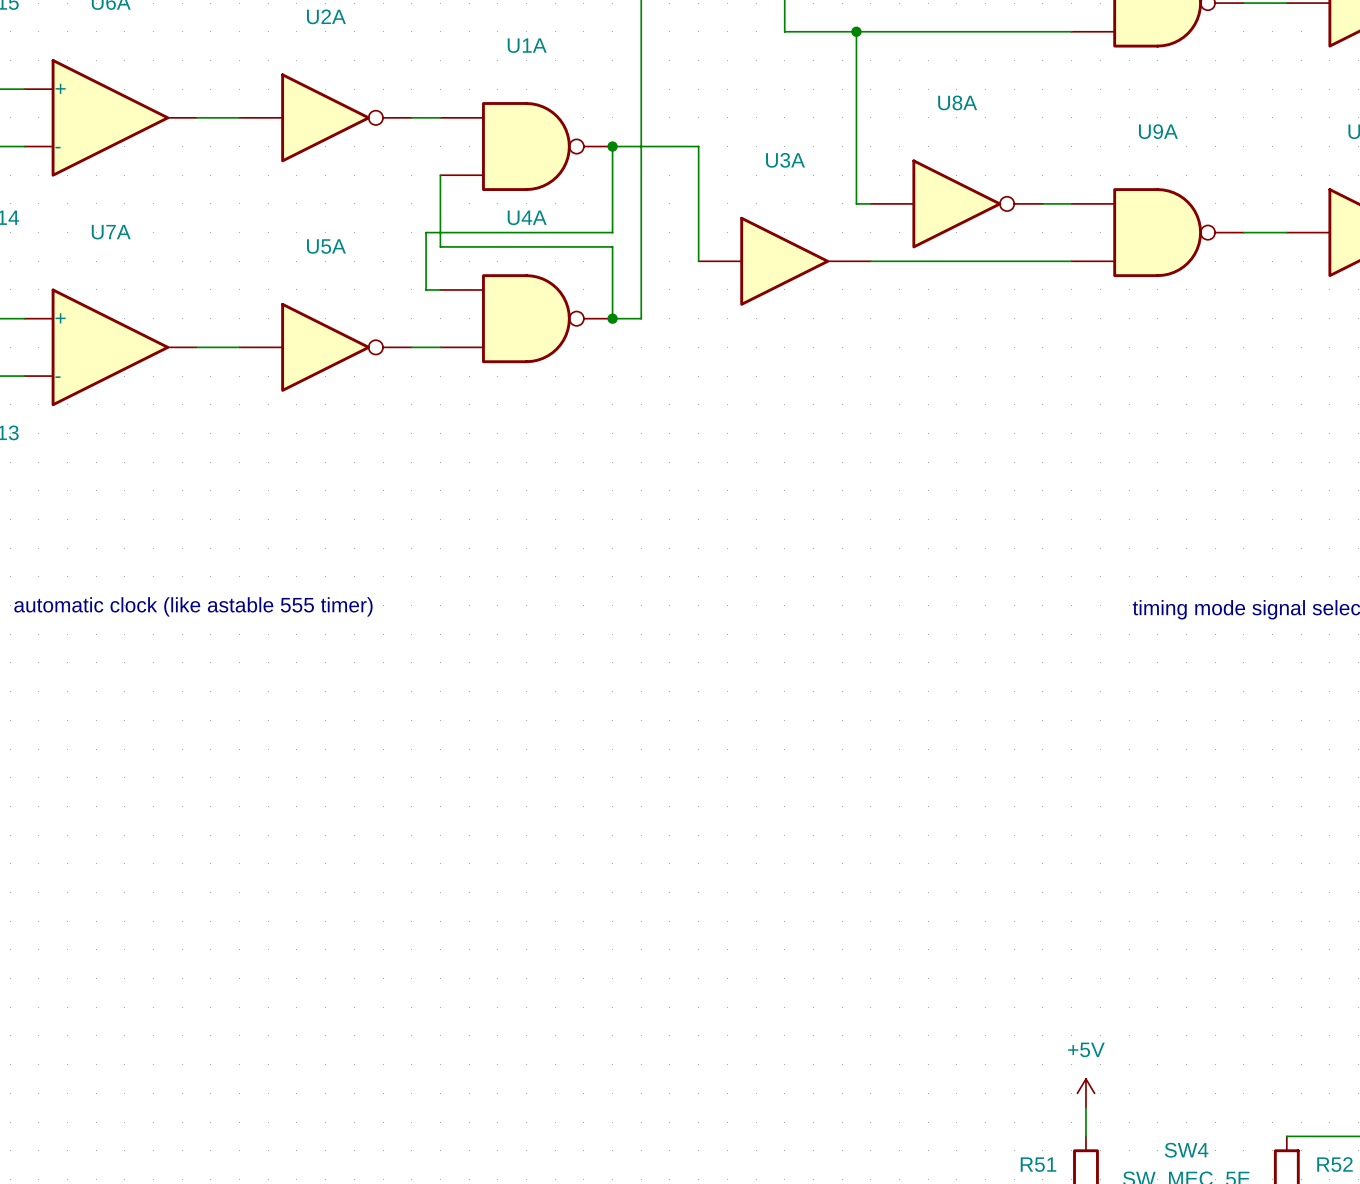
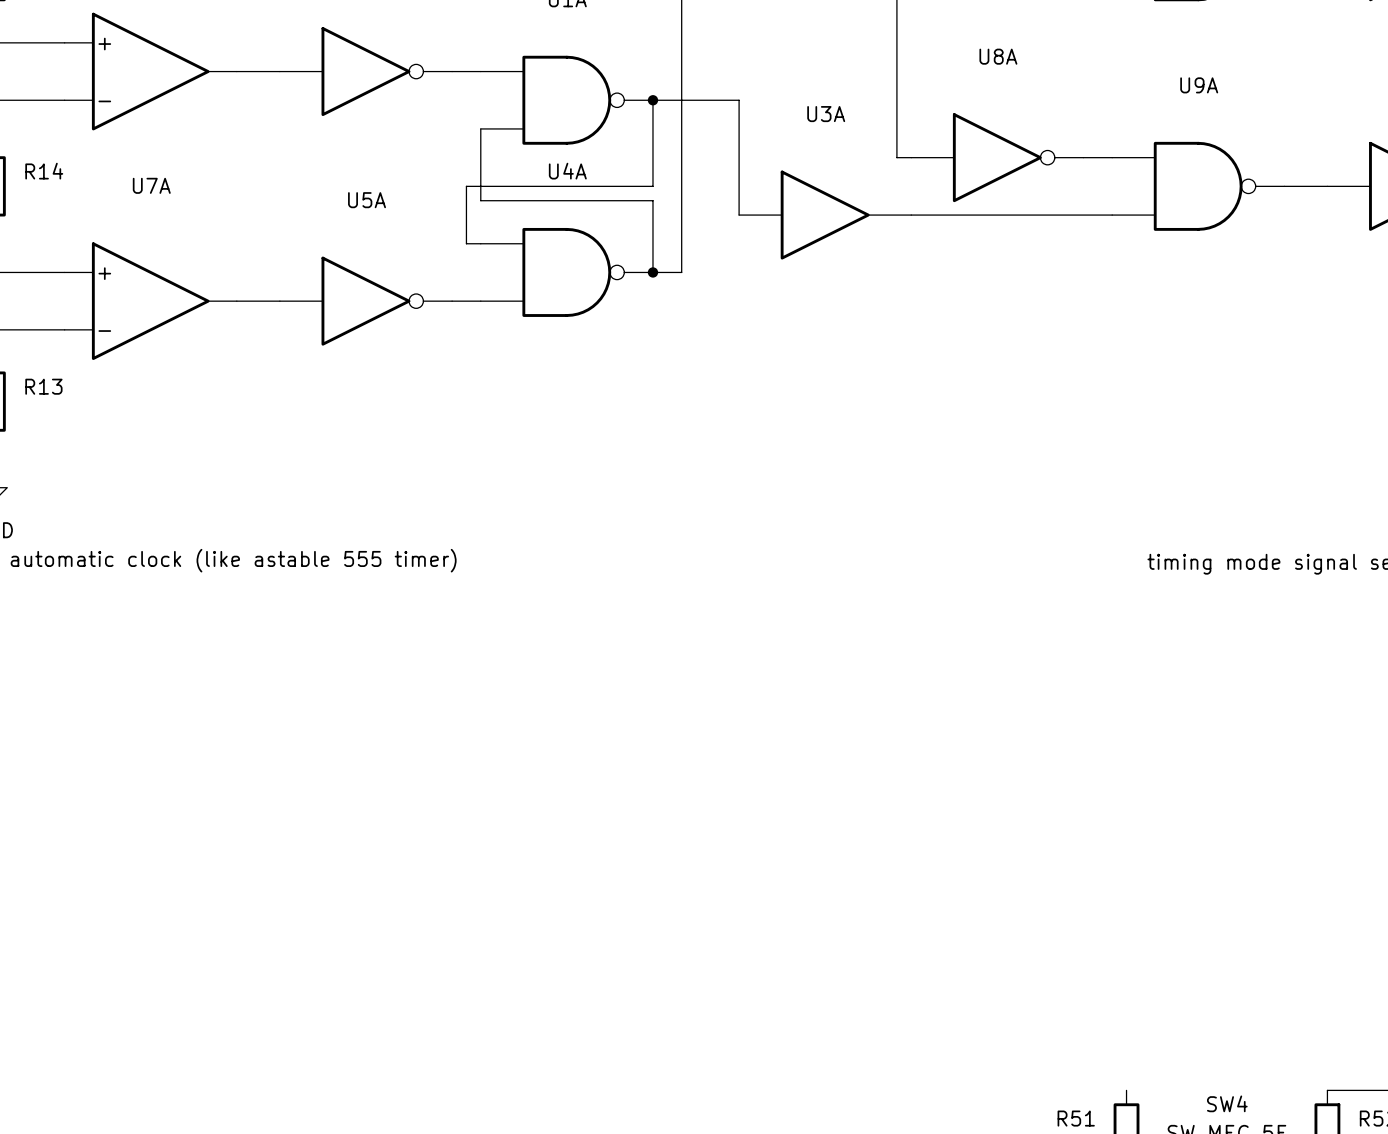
power symbol: +5V (1085, 1093) -> none
wire: (1085, 1107) (1085, 1136) -> none

